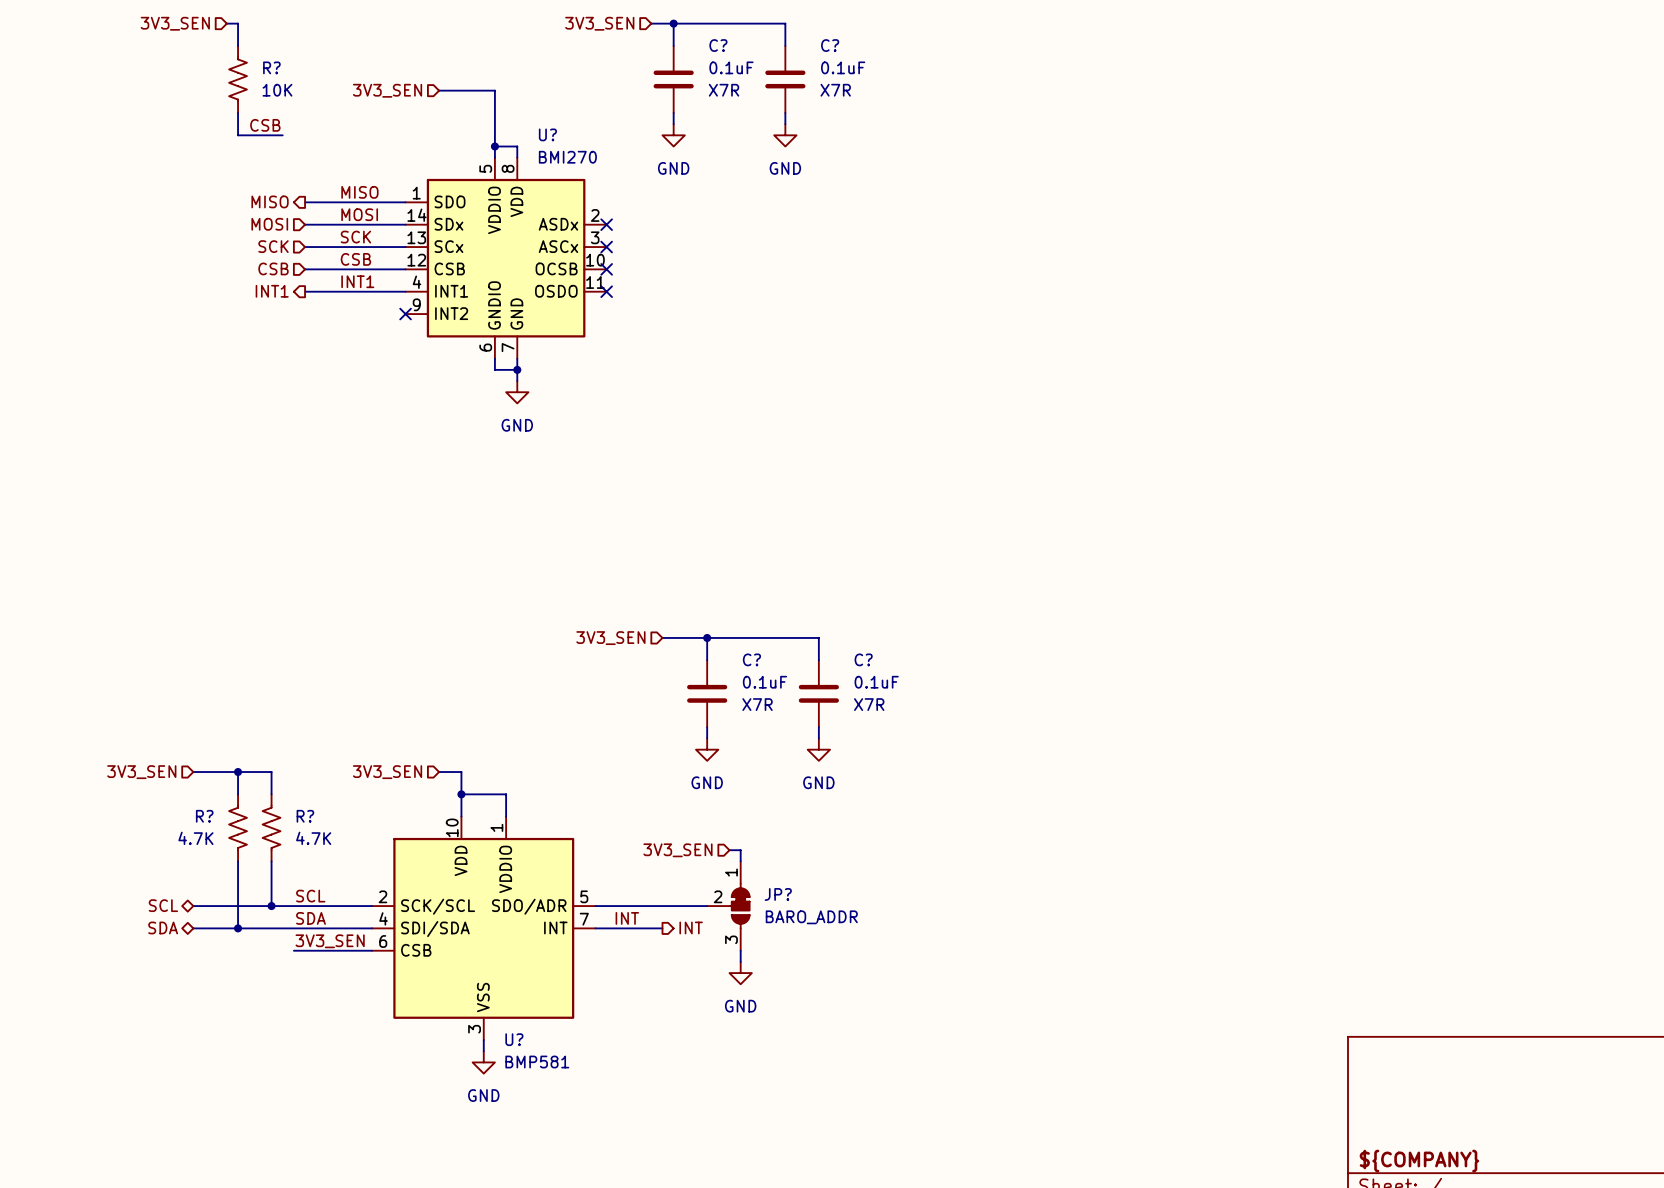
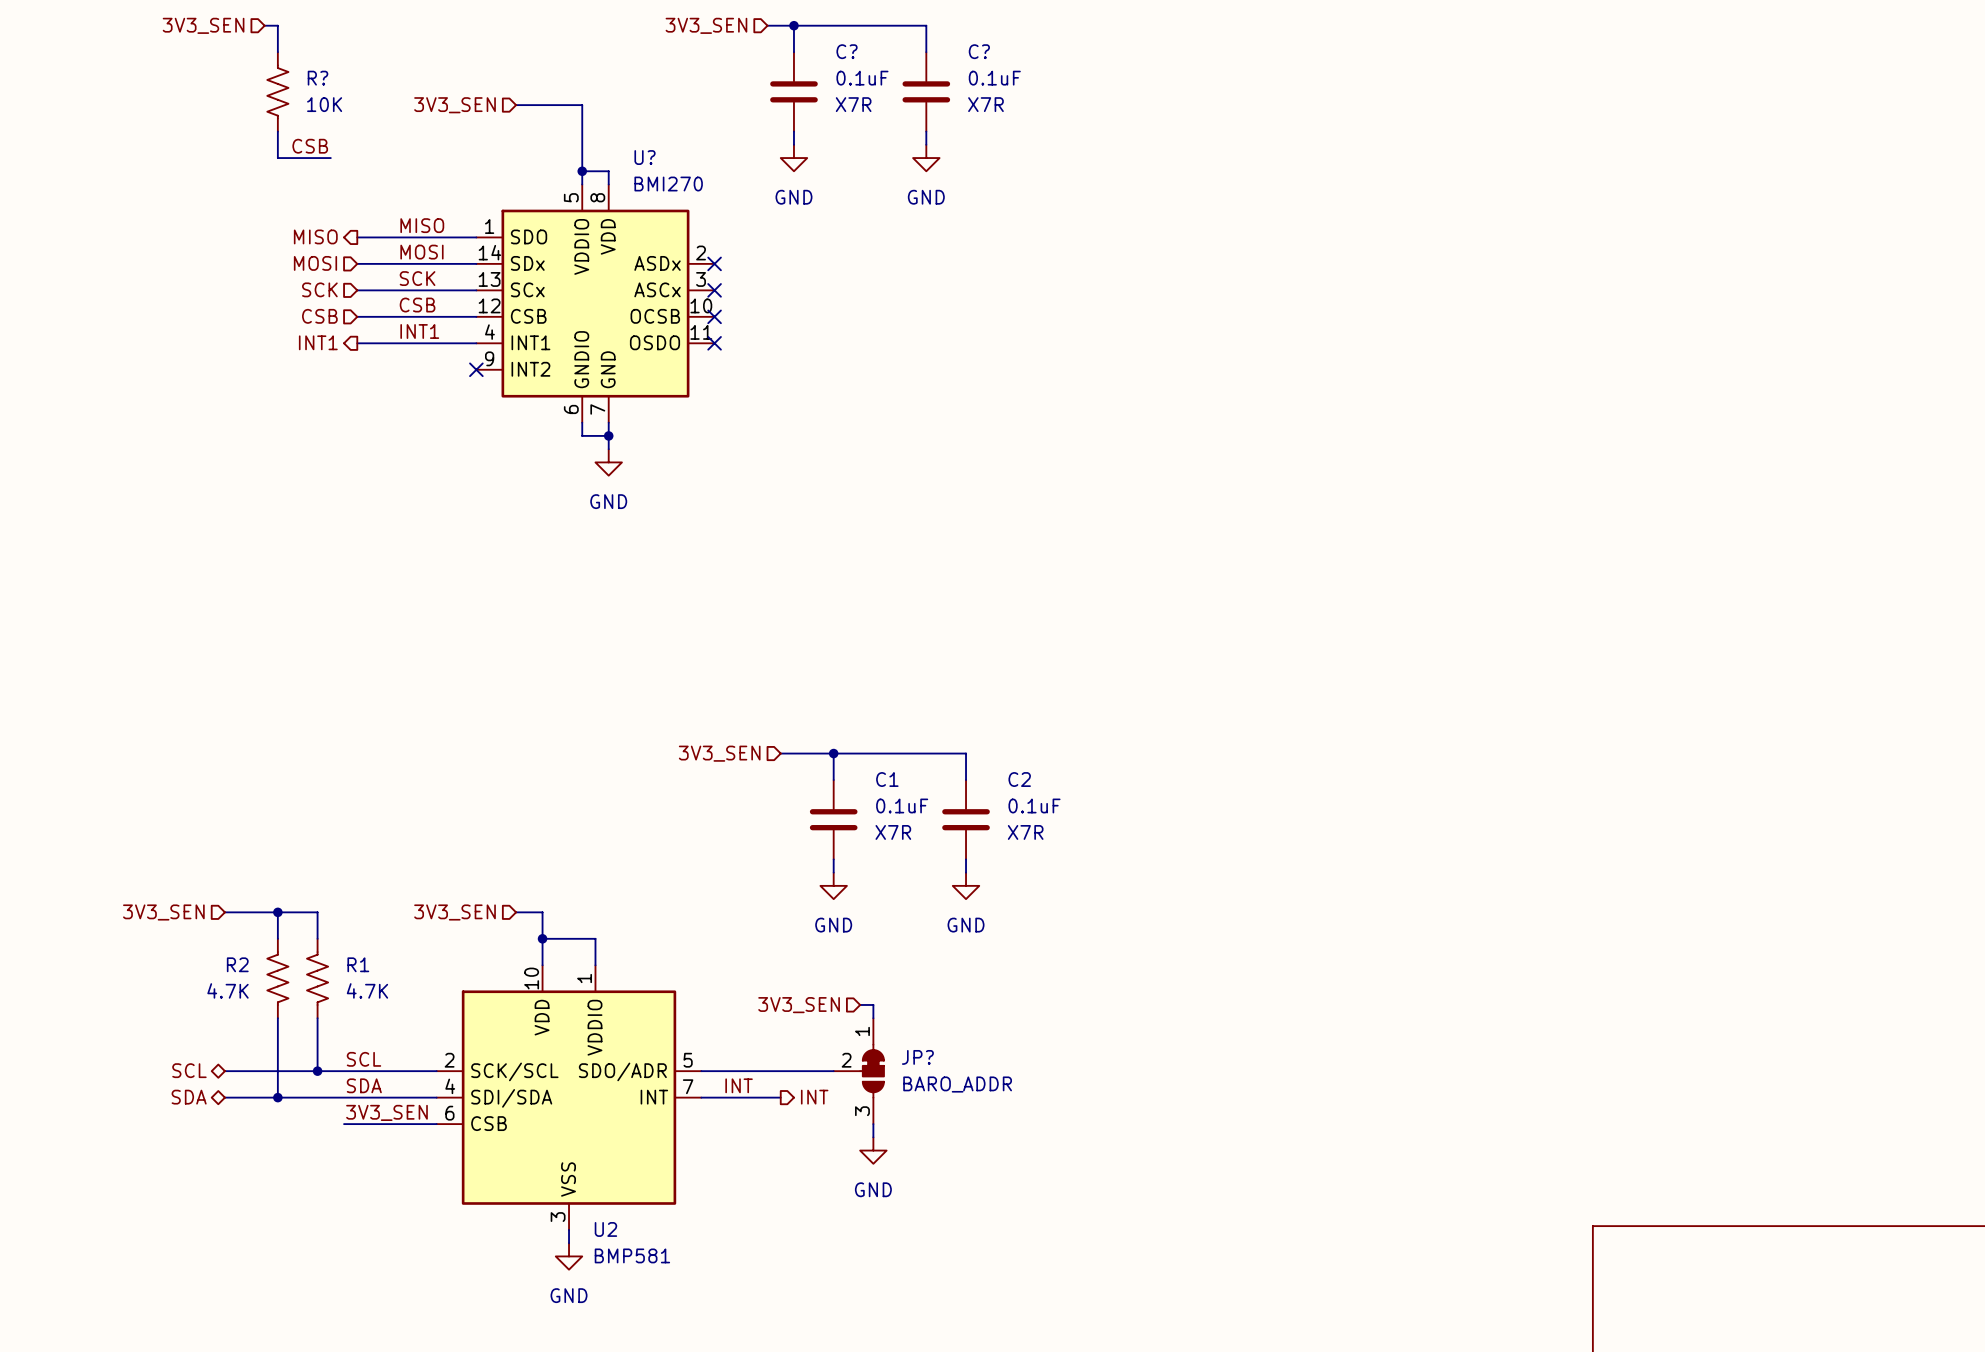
C? name: C? (751, 659) -> C1 (887, 779)
C? name: C? (863, 659) -> C2 (1019, 779)
R? name: R? (204, 816) -> R2 (237, 964)
R? name: R? (305, 816) -> R1 (358, 964)
U? name: U? (514, 1039) -> U2 (605, 1229)

